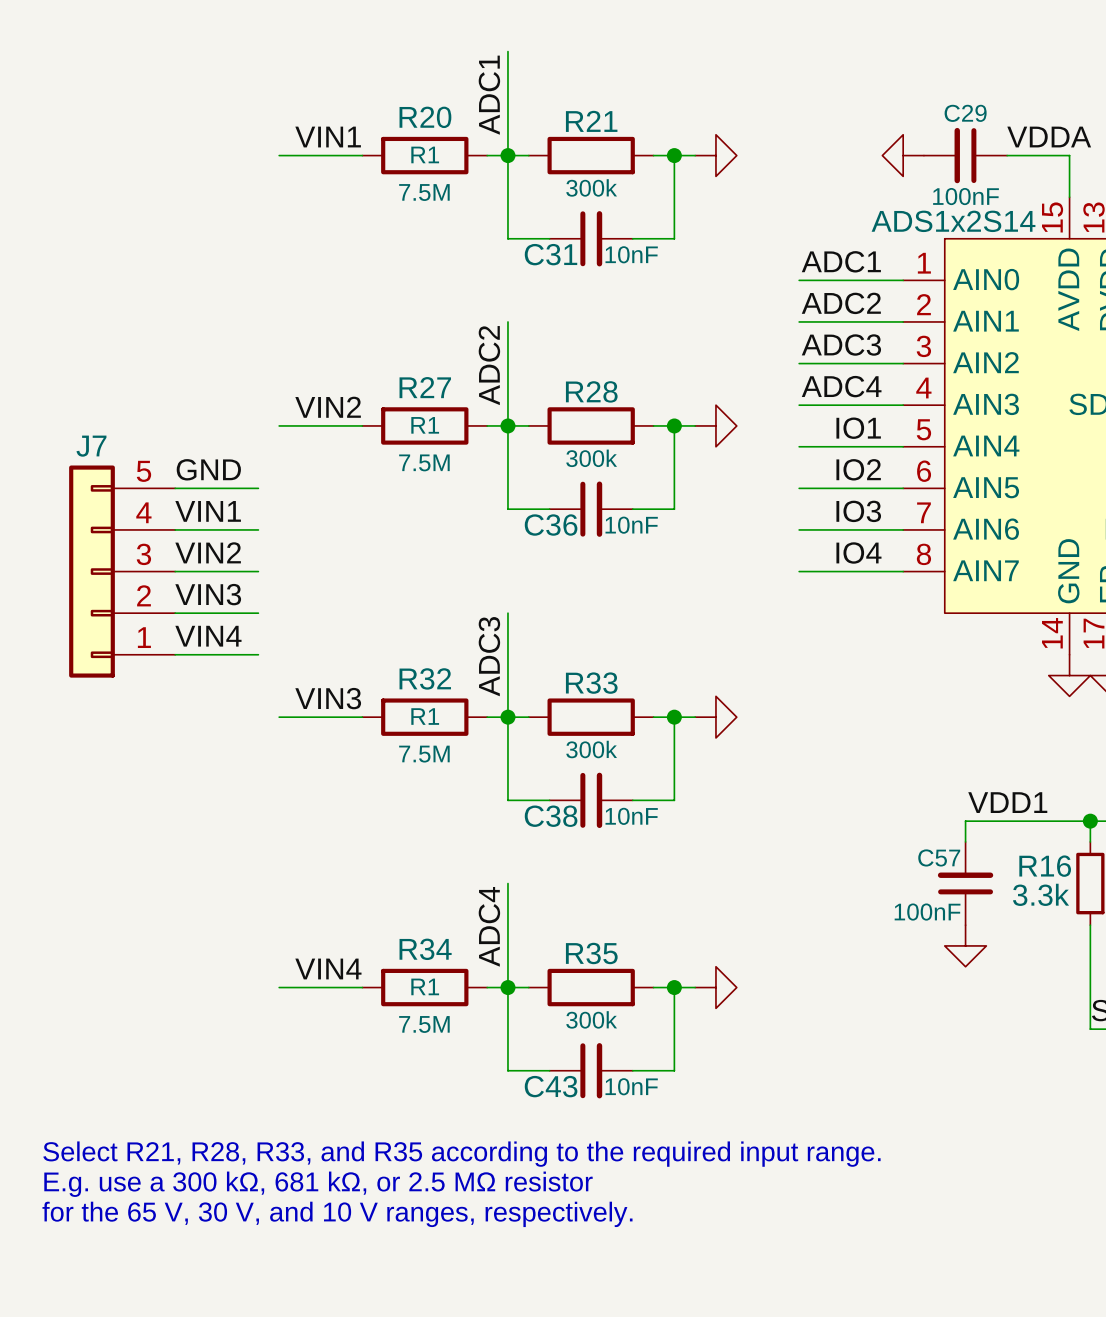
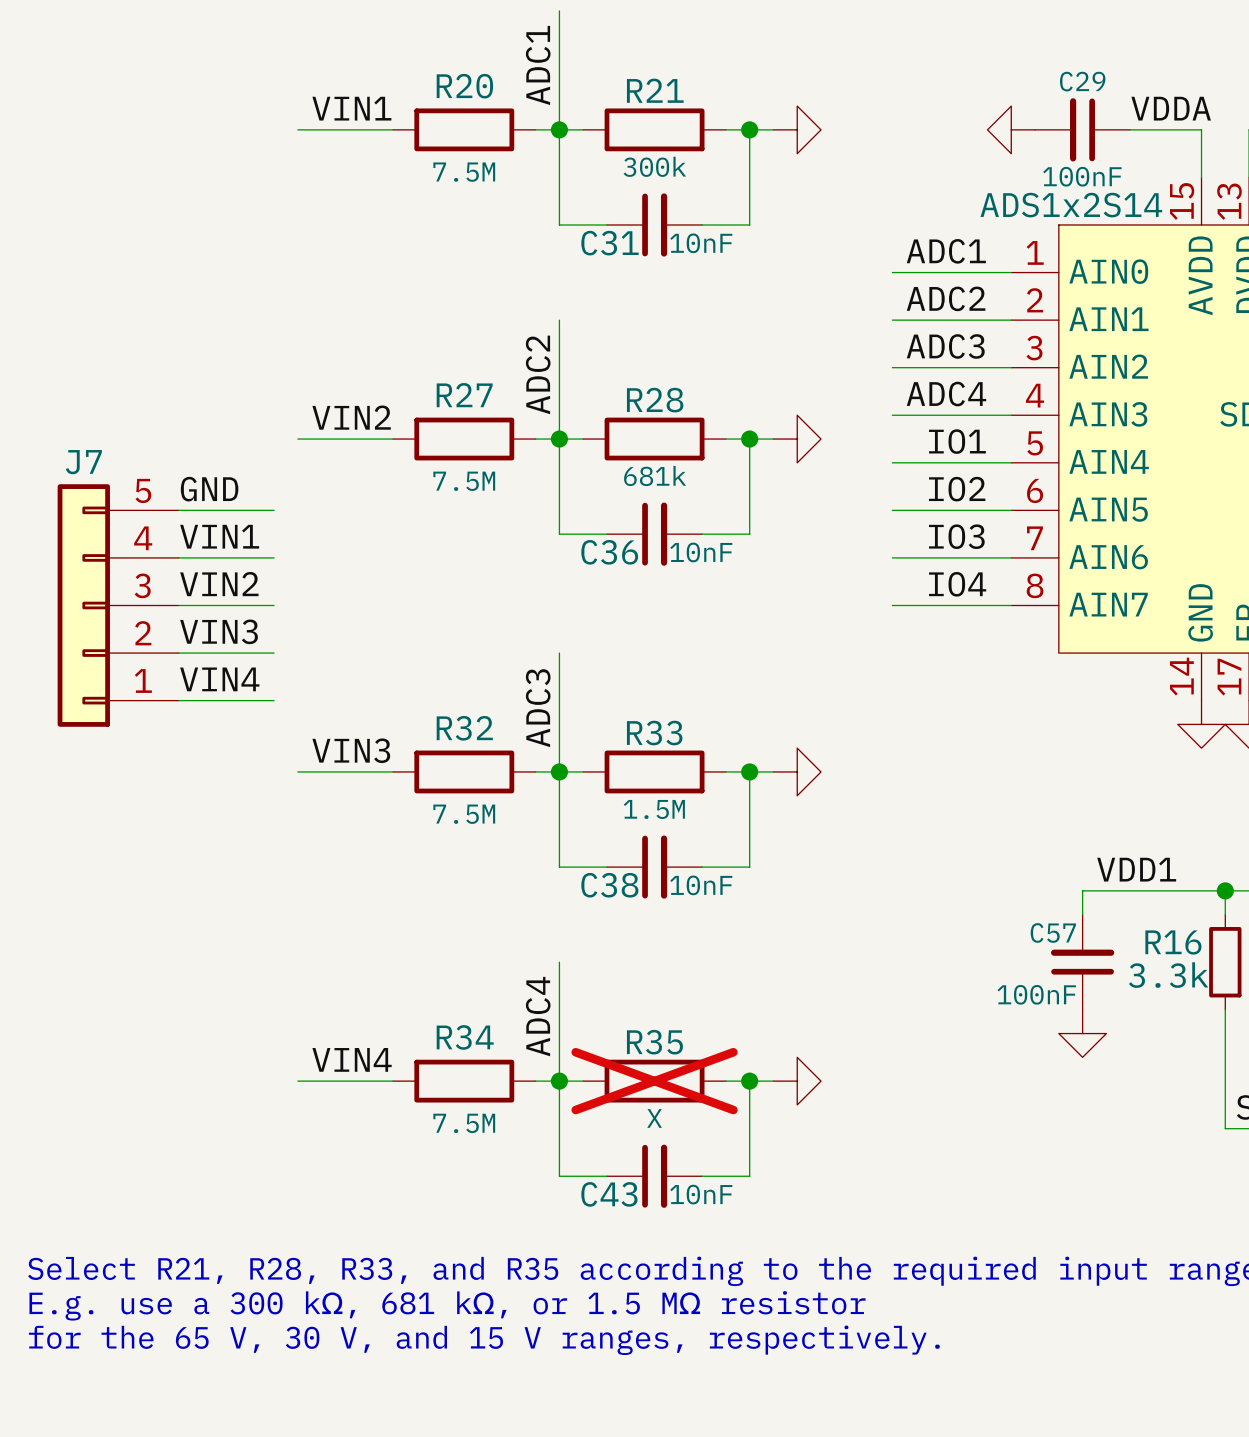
R20 text: R1 (425, 154) -> none
R27 text: R1 (425, 425) -> none
R28 value: 300k (591, 458) -> 681k (655, 475)
R32 text: R1 (425, 716) -> none
R33 value: 300k (591, 749) -> 1.5M (654, 809)
R34 text: R1 (425, 986) -> none
R35 do-not-place cross: none -> (654, 1081)
R35 value: 300k (591, 1019) -> X (654, 1118)
text: E.g. use a 300 kΩ, 681 kΩ, or 2.5 MΩ resistor (318, 1184) -> E.g. use a 300 kΩ, 681 kΩ, or 1.5 MΩ resistor (447, 1305)
text: for the 65 V, 30 V, and 10 V ranges, respectively. (337, 1214) -> for the 65 V, 30 V, and 15 V ranges, respectively. (484, 1340)

